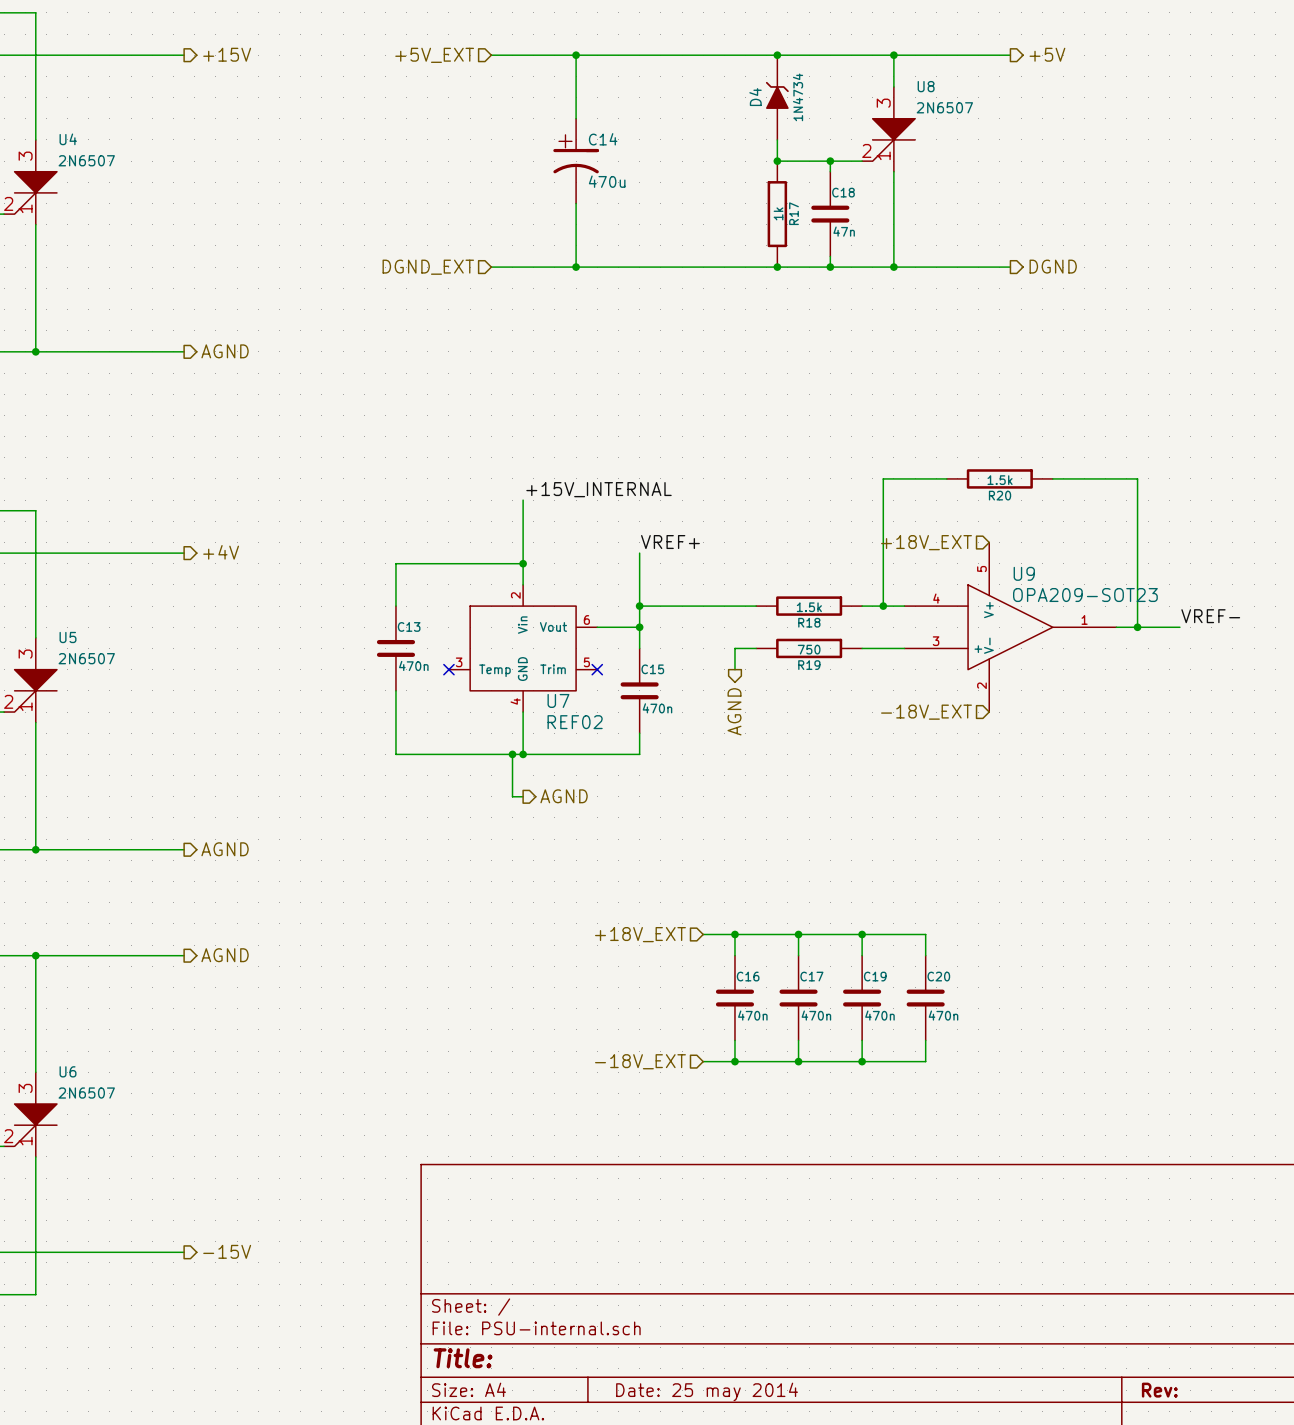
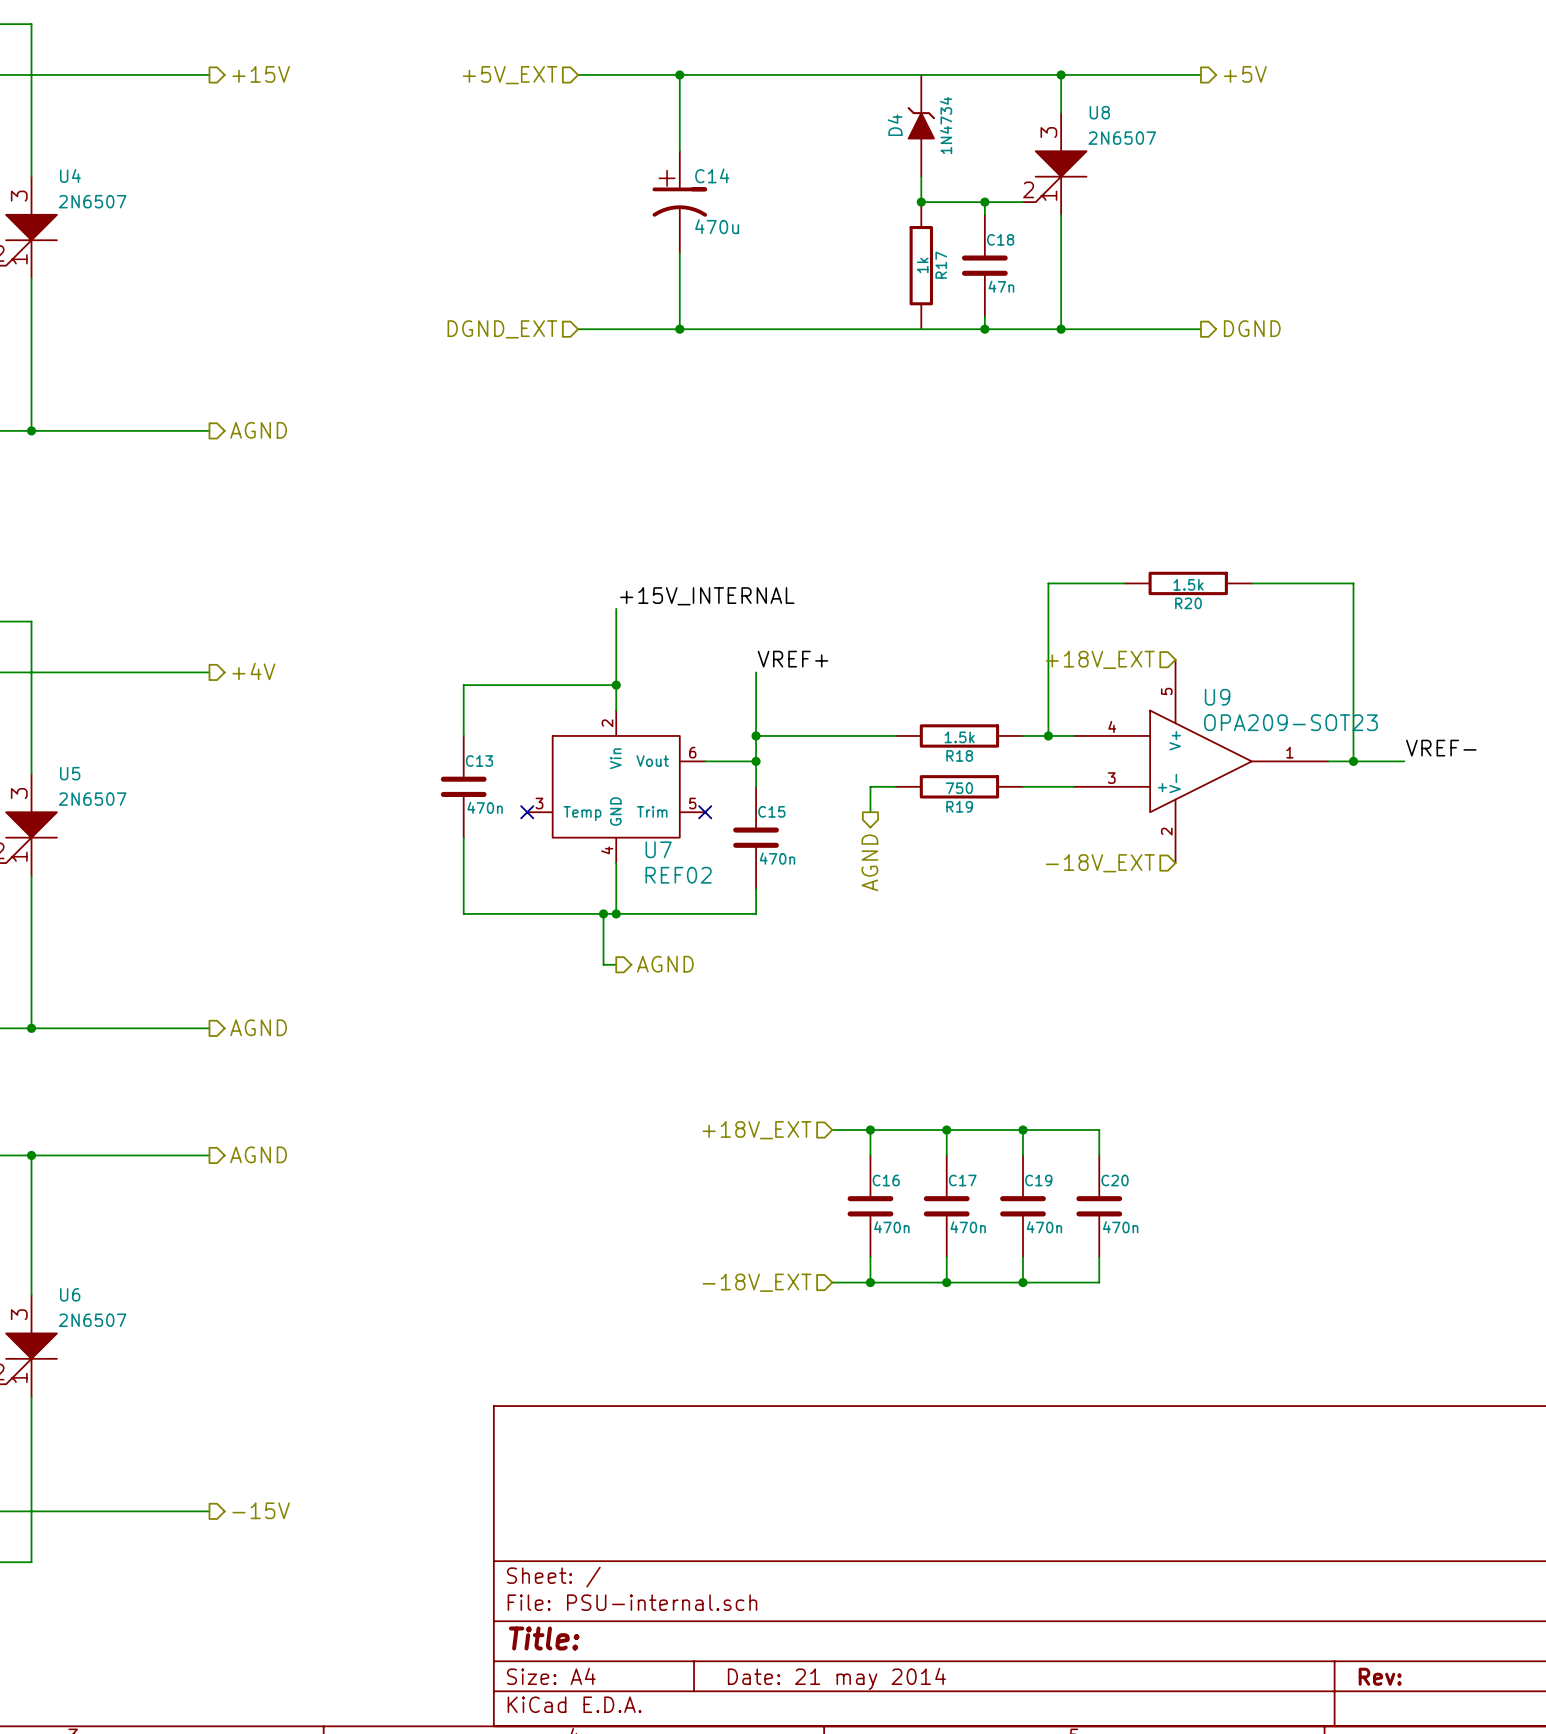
junction: (777, 55) -> none
junction: (777, 267) -> none
title block: Date: 25 may 2014 (707, 1391) -> Date: 21 may 2014 (836, 1678)

